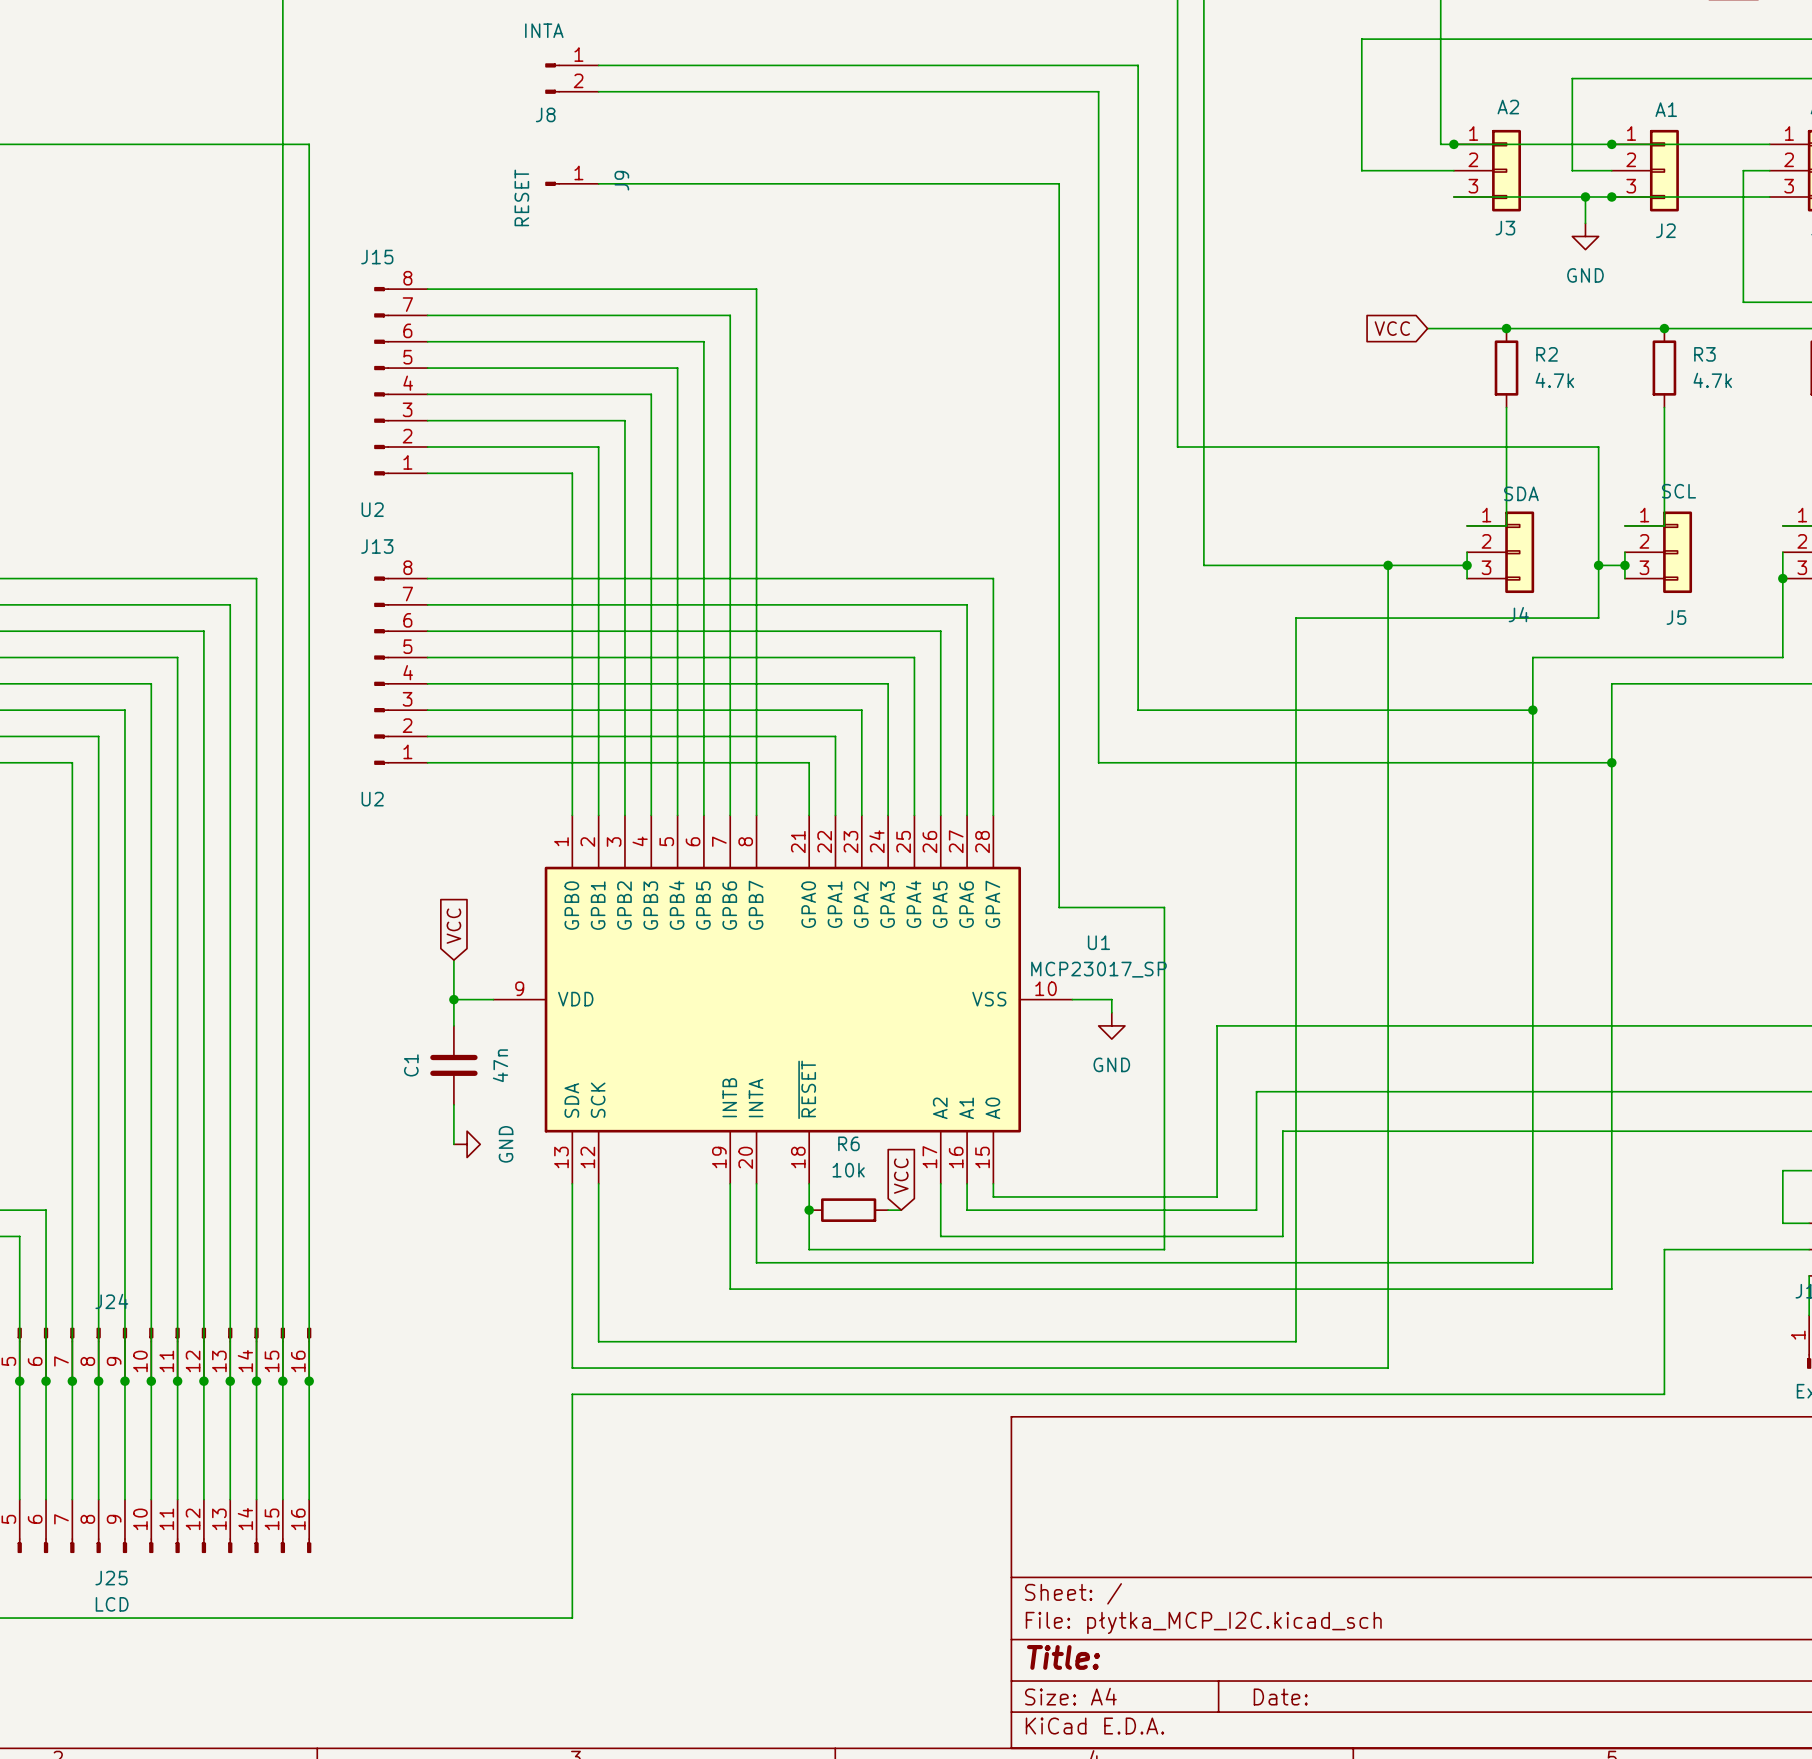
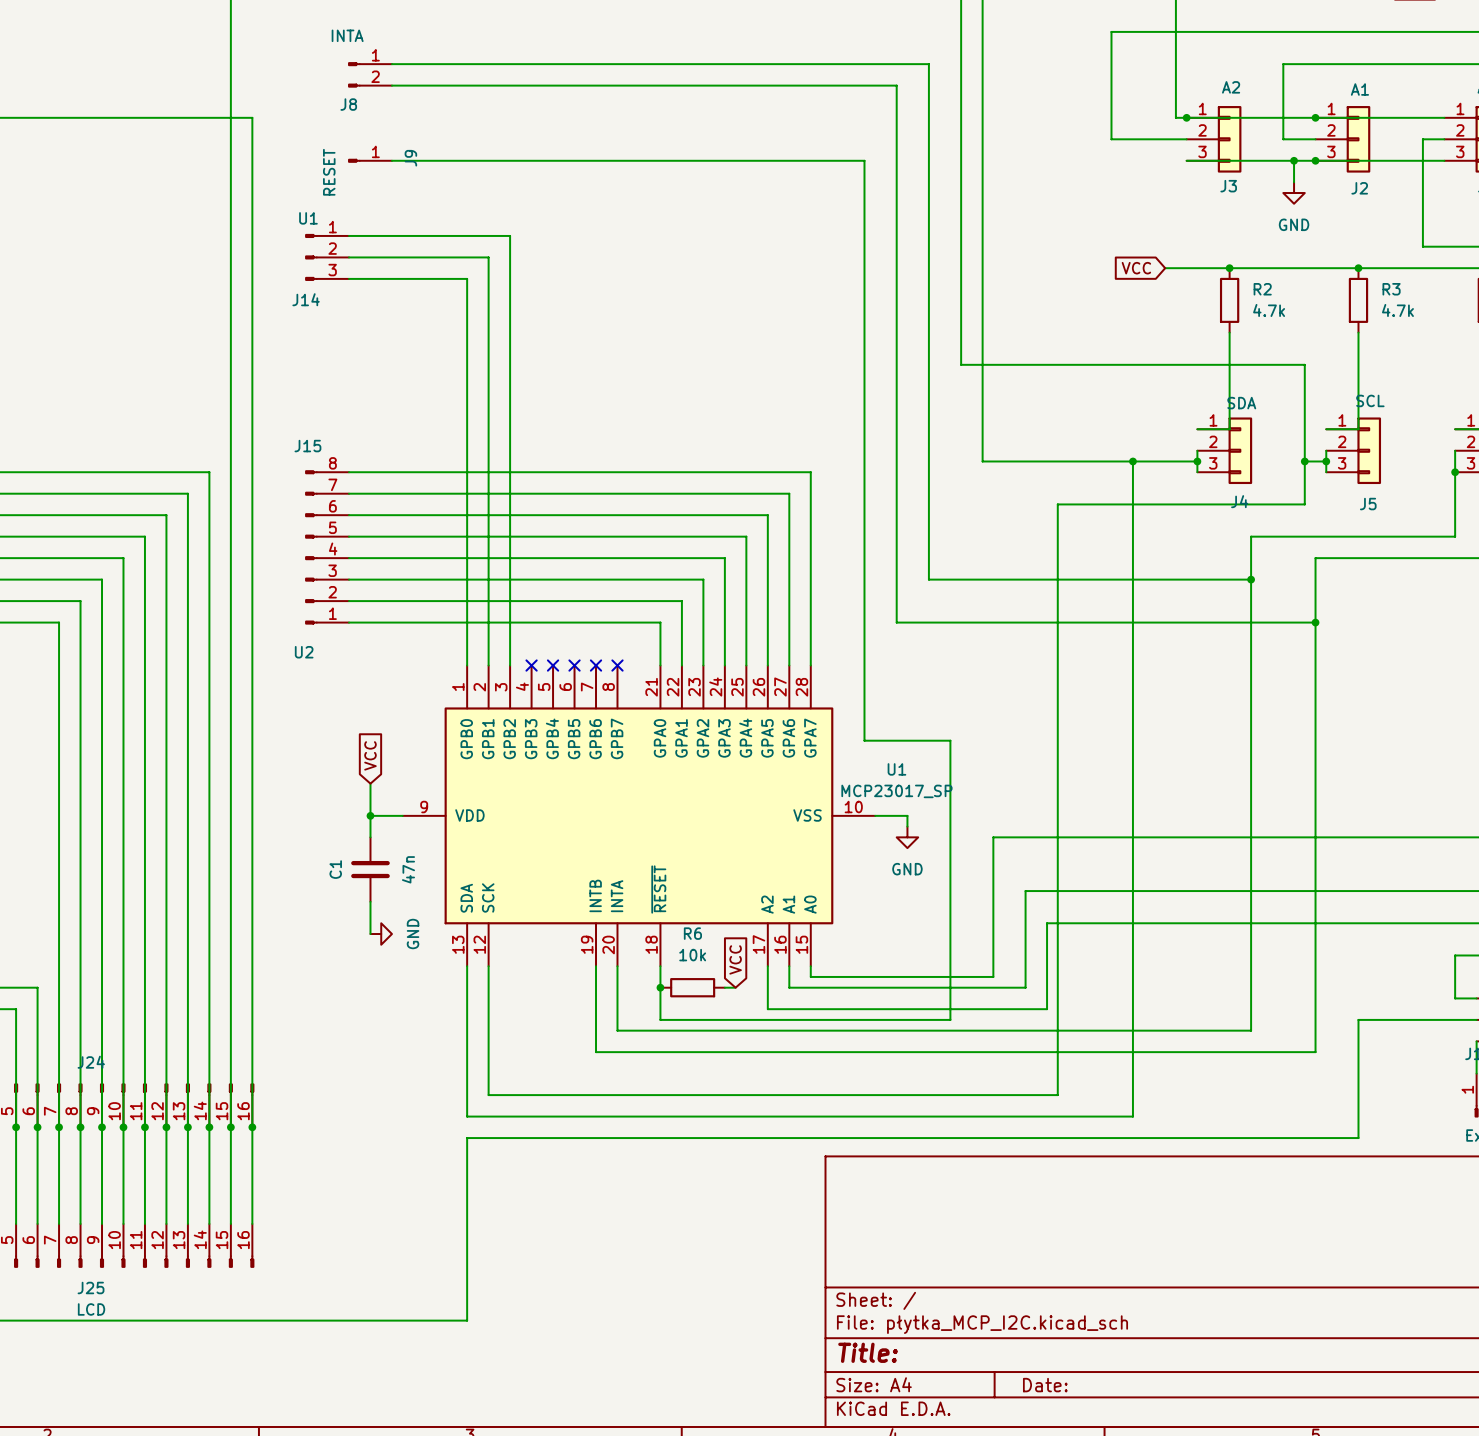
wire: (598, 65) (1138, 65) (1138, 78) -> (391, 64) (928, 64)
J8 position: (571, 78) -> (370, 74)
wire: (598, 91) (1098, 91) (1098, 104) -> (391, 85) (896, 85)
J9 position: (571, 183) -> (370, 160)
wire: (598, 183) (1059, 183) (1059, 197) -> (391, 160) (864, 160)
wire: (624, 289) (756, 289) (756, 815) -> none
J14: none -> U1 (327, 257)
wire: (598, 315) (730, 315) (730, 815) -> none
wire: (572, 341) (703, 341) (703, 815) -> none
wire: (427, 368) (677, 368) (677, 815) -> none
J15: U2 (400, 381) -> none
wire: (427, 394) (651, 394) (651, 815) -> none
wire: (427, 420) (624, 420) -> (510, 235) (510, 343)
wire: (427, 446) (598, 446) -> (488, 257) (488, 364)
wire: (427, 473) (572, 473) -> (467, 278) (467, 386)
J13 name: J13 (377, 546) -> J15 (307, 446)
no-connect mark: none -> (531, 665)
no-connect mark: none -> (553, 665)
no-connect mark: none -> (574, 665)
no-connect mark: none -> (596, 665)
no-connect mark: none -> (617, 665)

